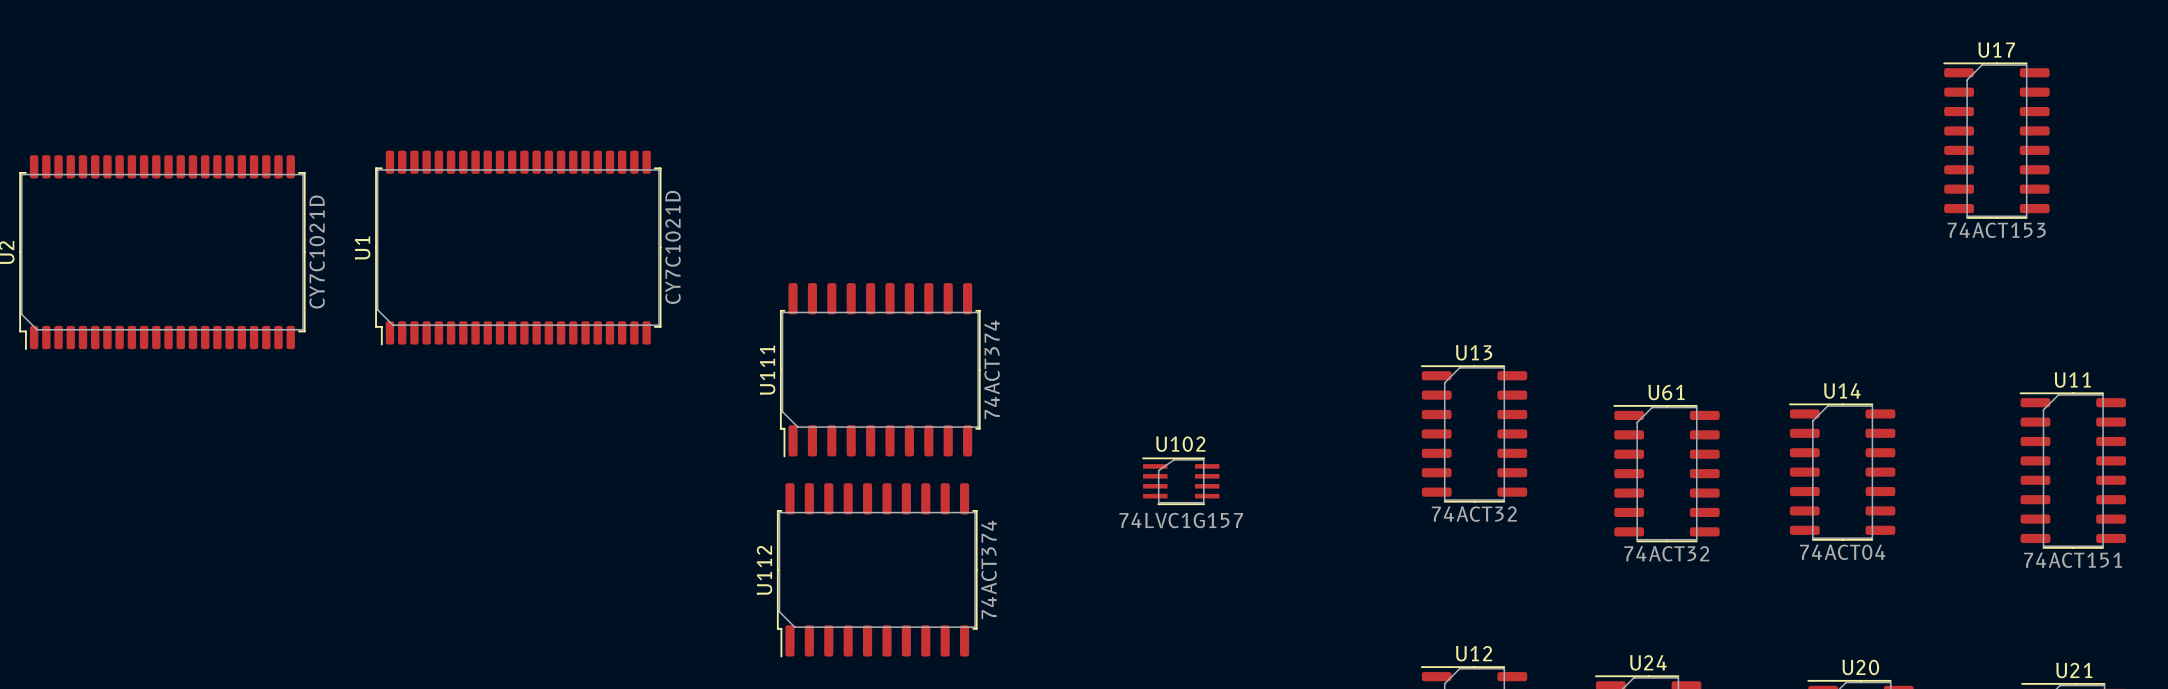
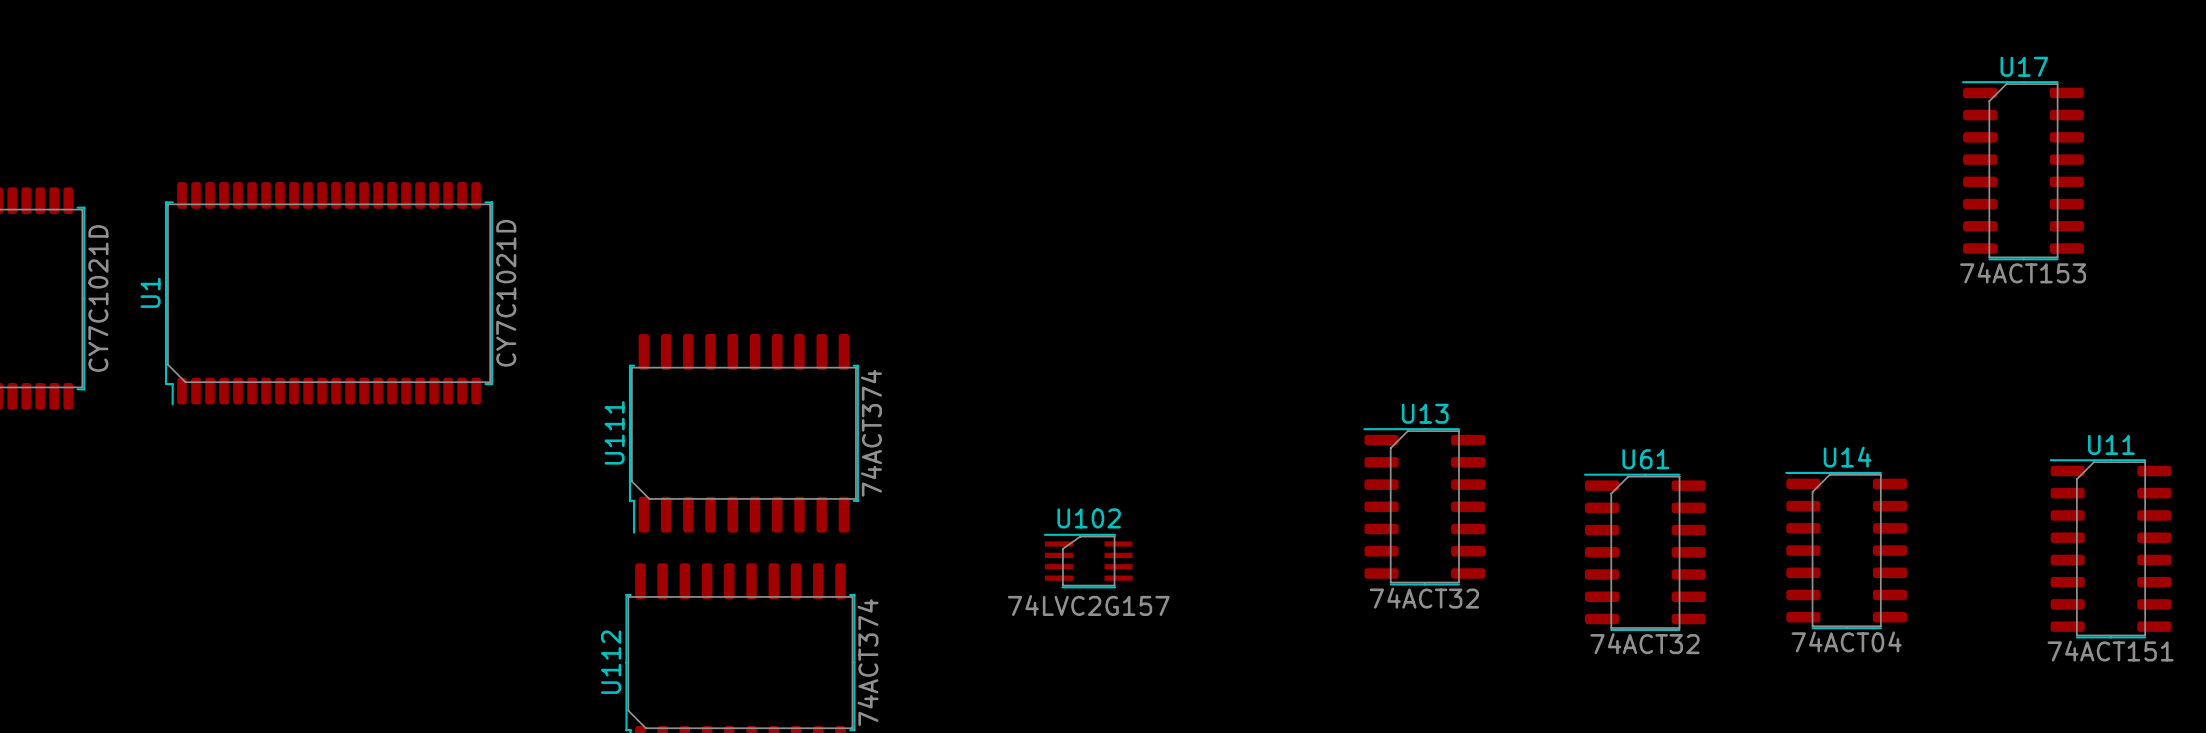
U102 value: 74LVC1G157 (1181, 520) -> 74LVC2G157 (1088, 605)

